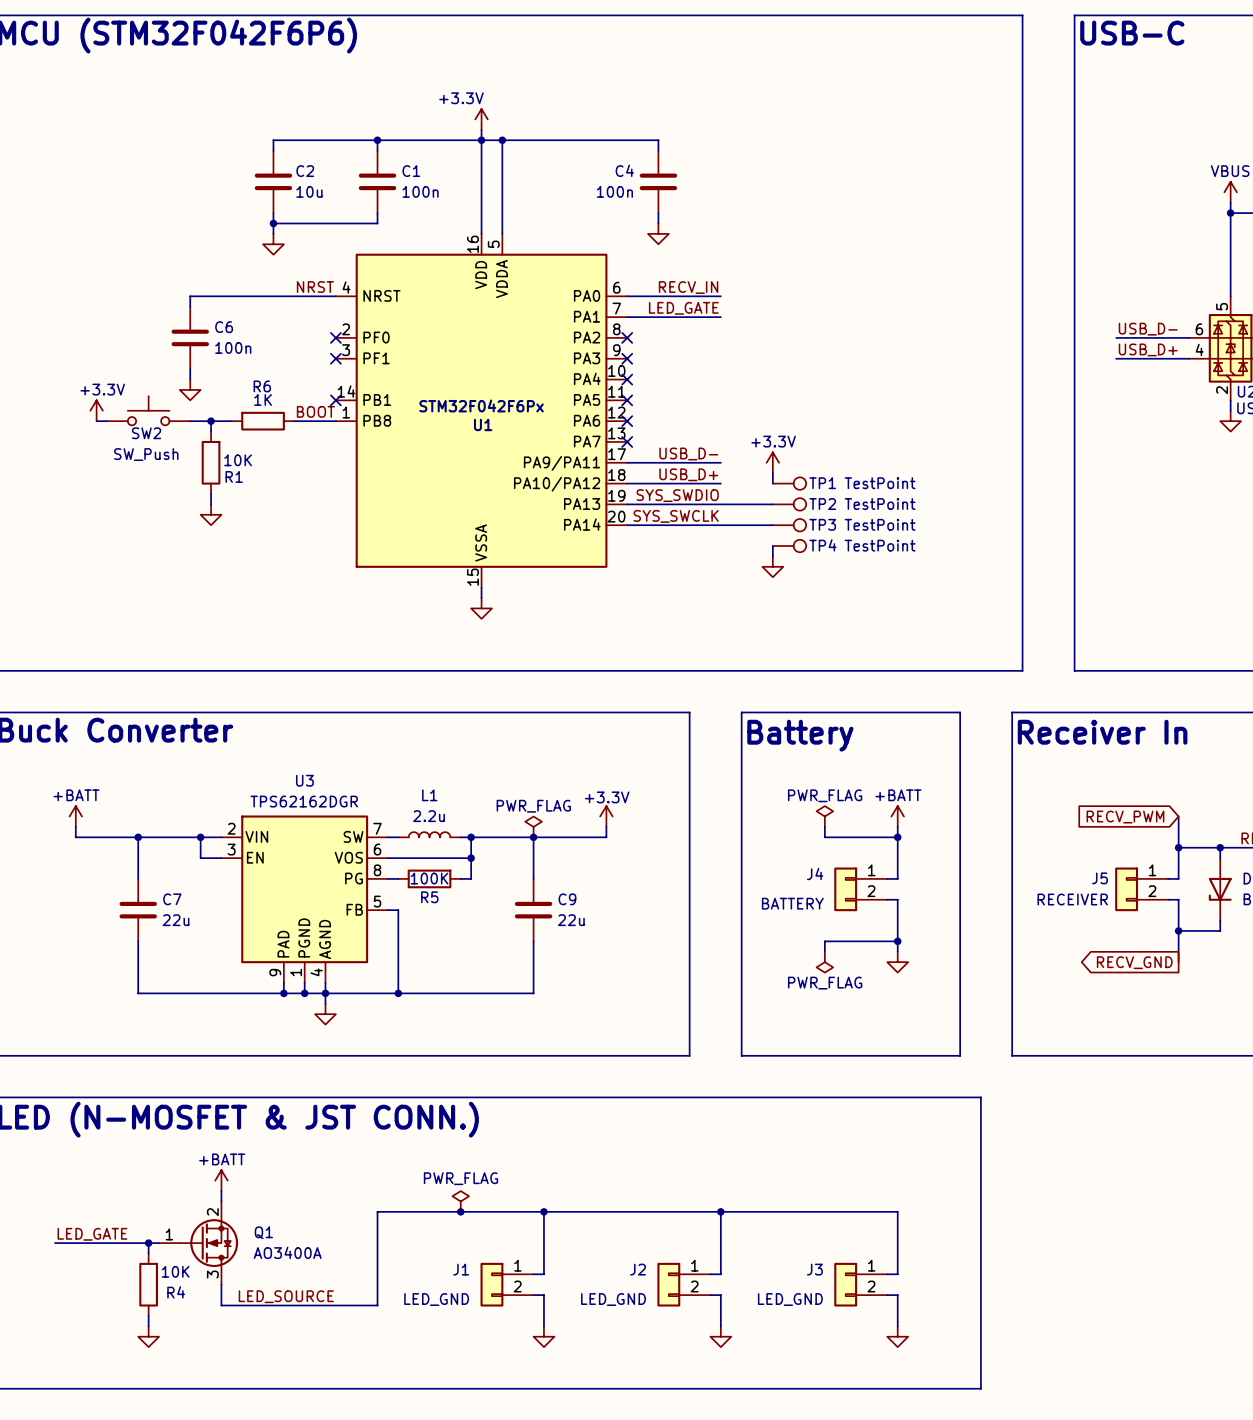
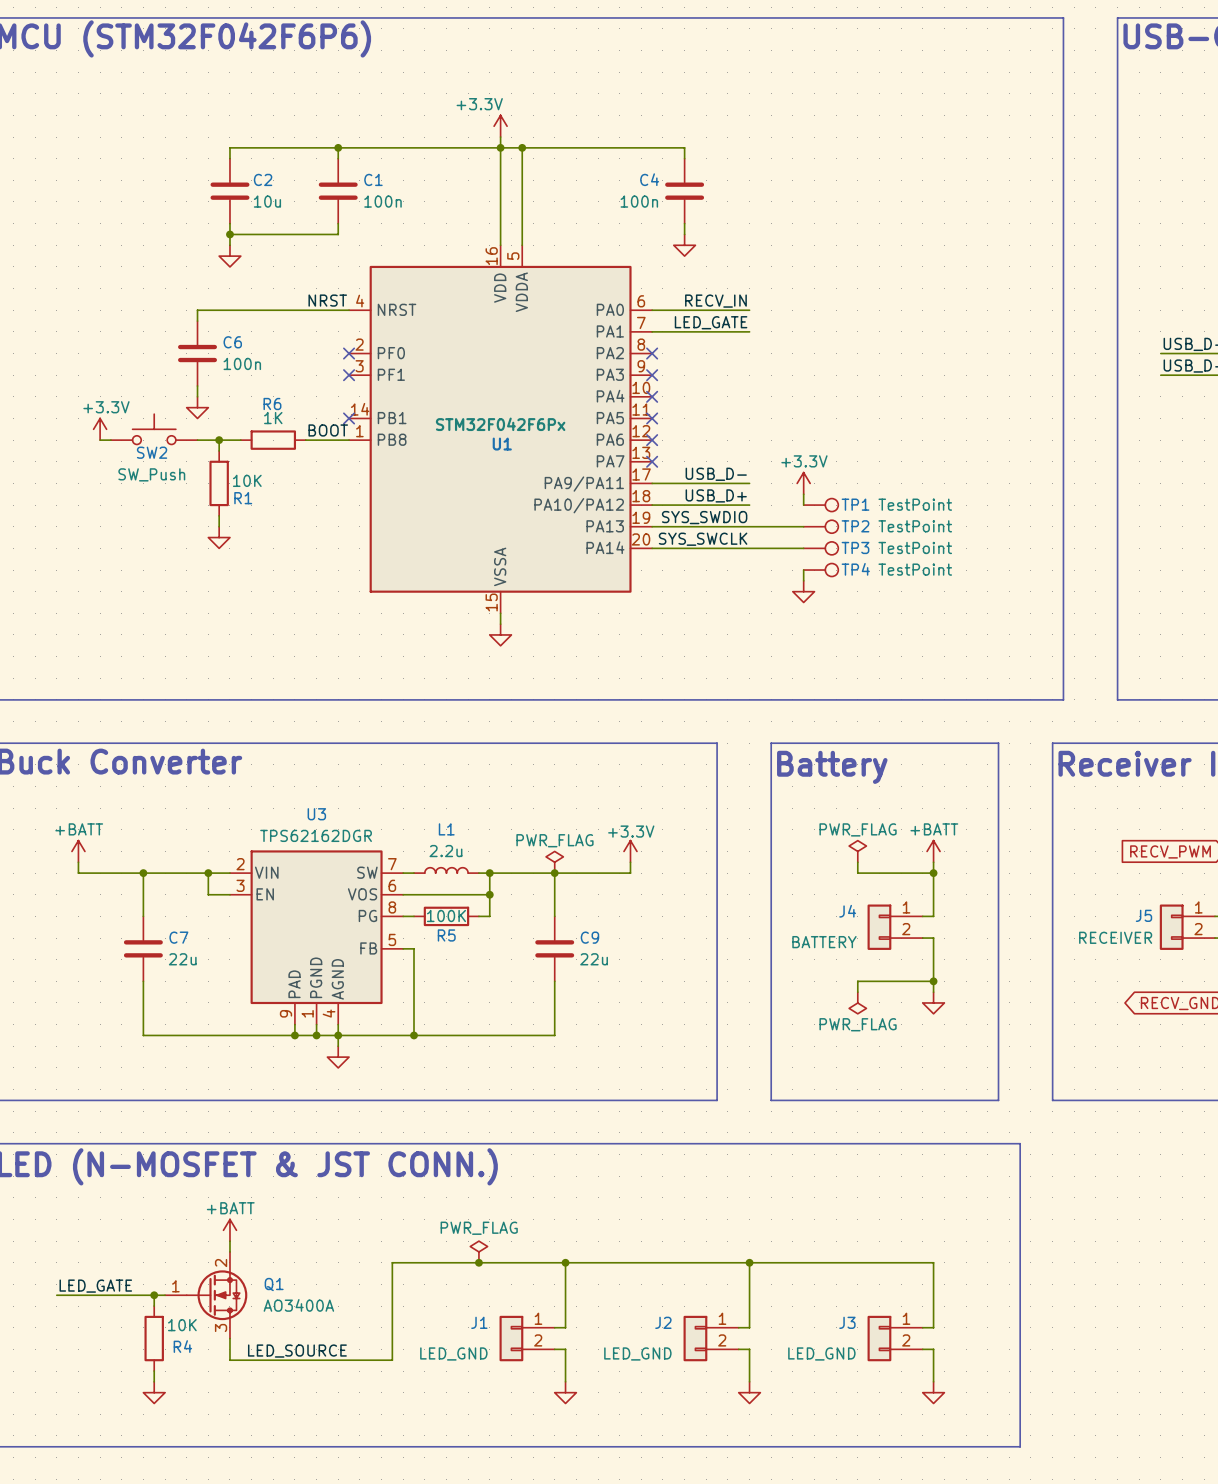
wire: (273, 140) (273, 150) -> (284, 147) (229, 147) (229, 158)
junction: none -> (338, 147)
wire: (377, 140) (377, 150) -> (338, 147) (338, 158)
junction: (377, 140) -> none
C2 position: (273, 181) -> (229, 191)
C1 position: (377, 181) -> (338, 191)
wire: (273, 213) (273, 233) -> (229, 223) (229, 245)
wire: (377, 213) (377, 223) (325, 223) -> (338, 223) (338, 234)
wire: none -> (229, 234) (284, 234)
junction: none -> (229, 234)
junction: (273, 223) -> none
power symbol position: (273, 244) -> (229, 256)

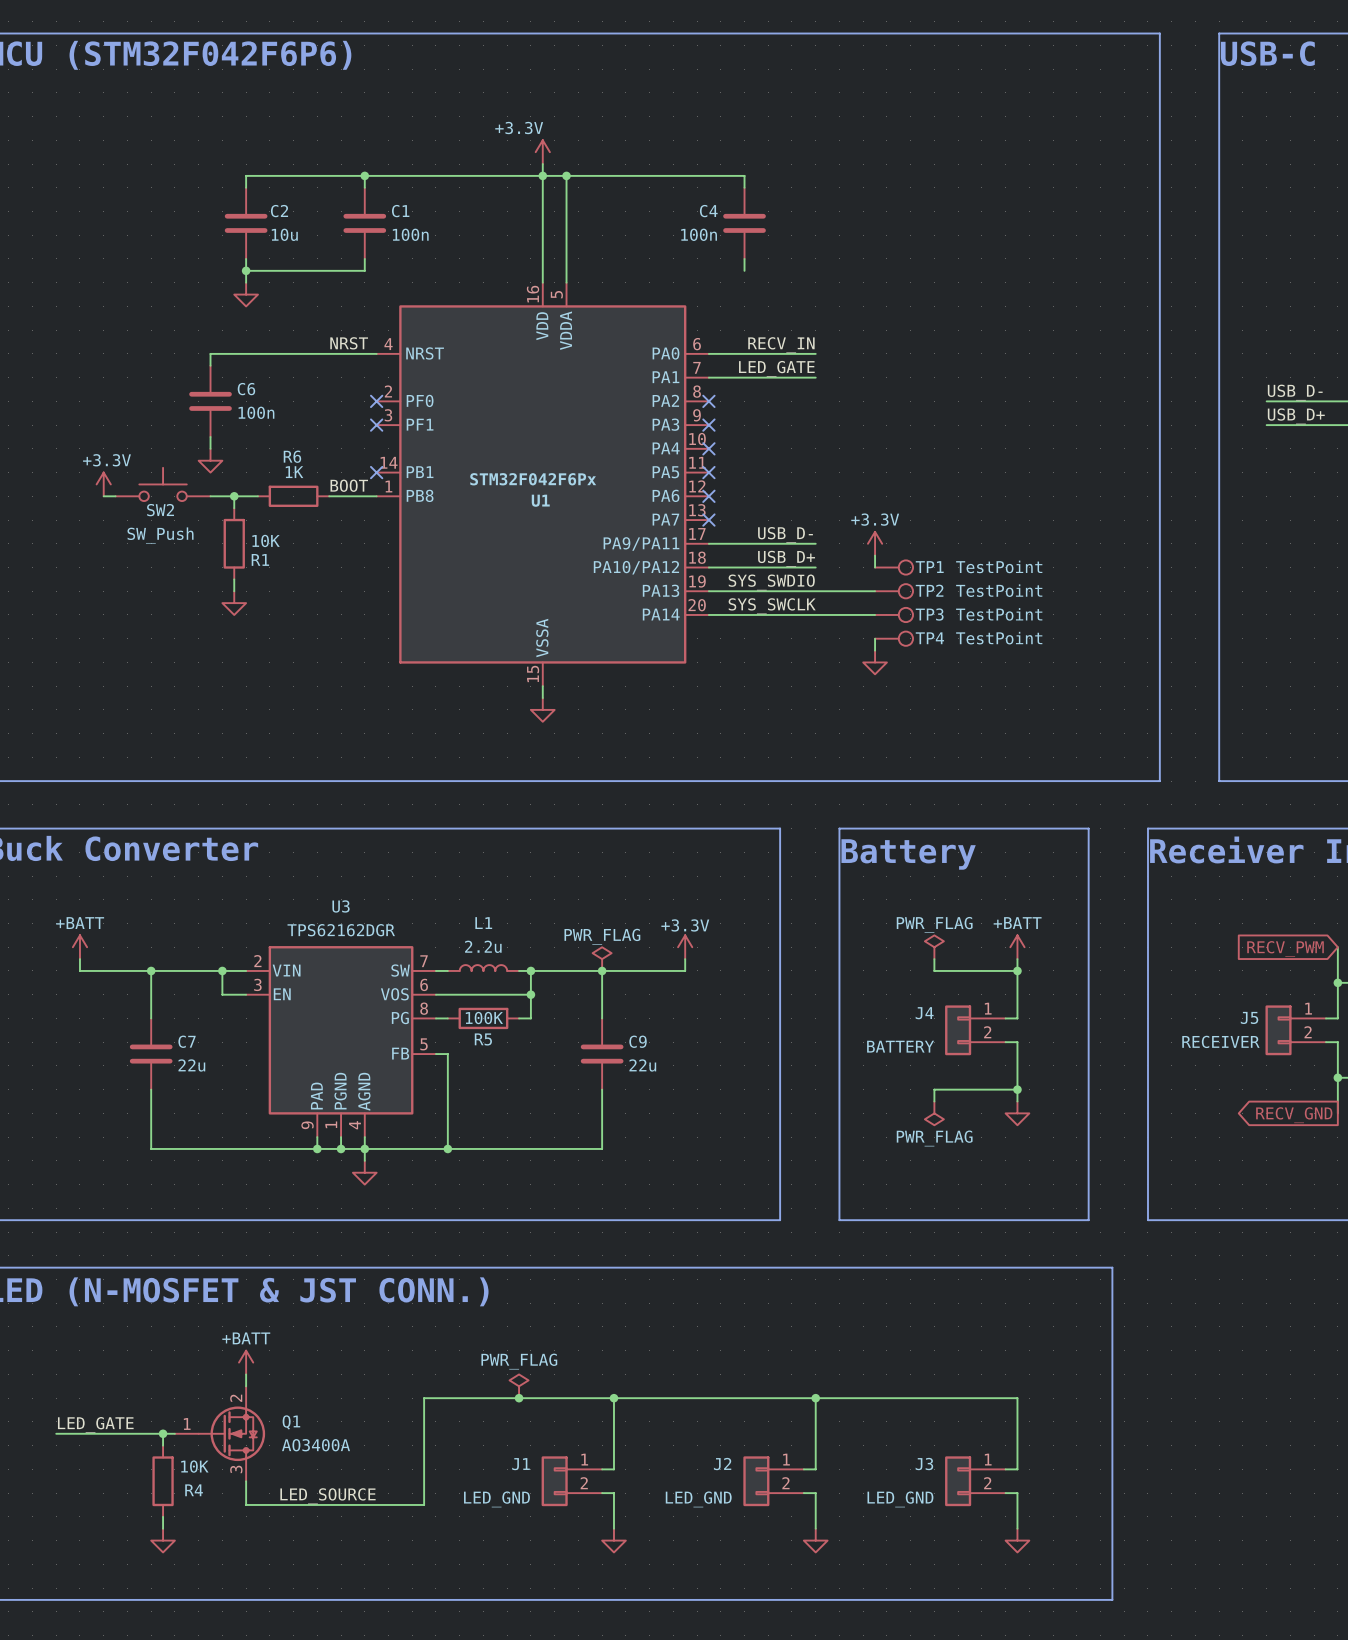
power symbol: (684, 245) -> none

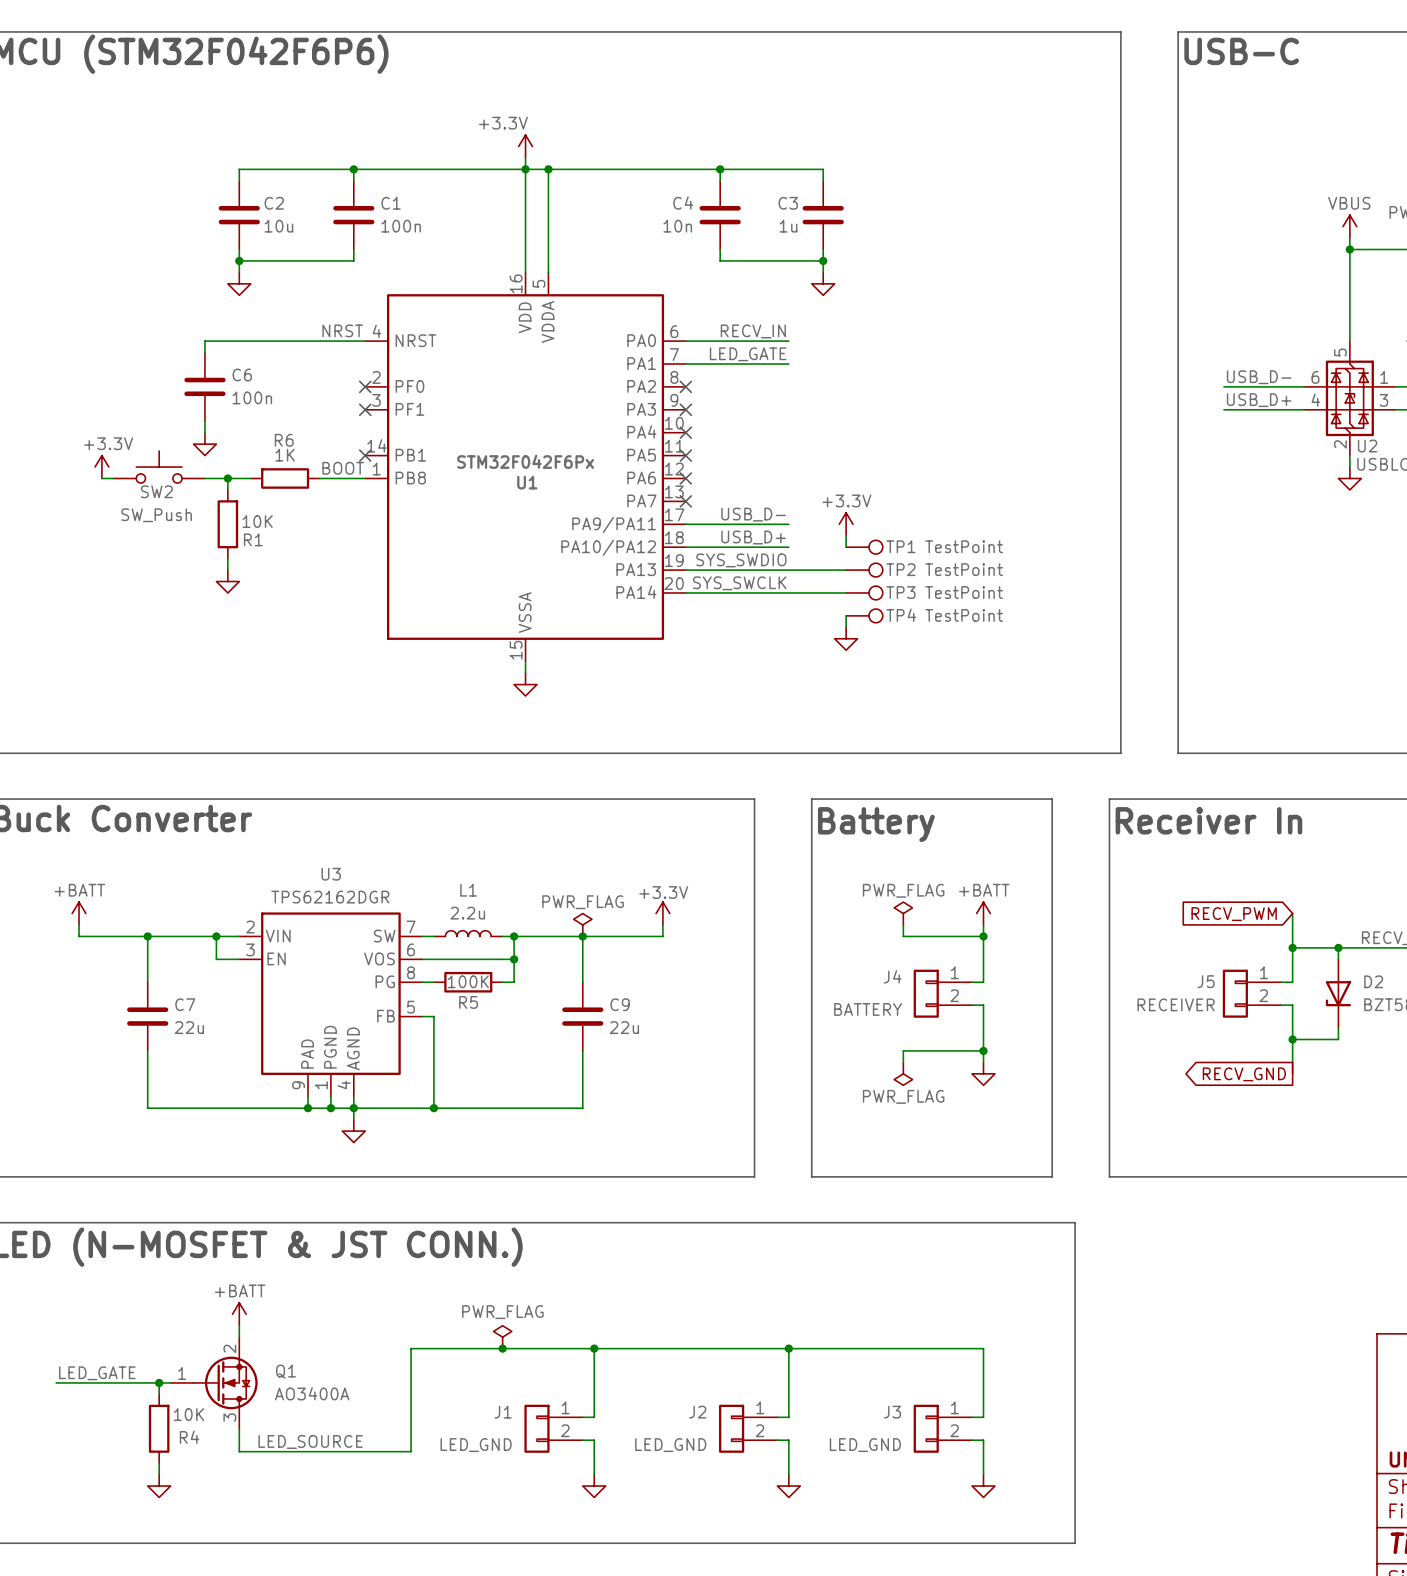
wire: none -> (720, 169) (823, 169) (823, 180)
junction: none -> (720, 169)
C3: none -> 1u (823, 215)
C4 value: 100n (699, 234) -> 10n (677, 226)
wire: none -> (823, 249) (823, 272)
wire: none -> (720, 260) (823, 260)
junction: none -> (823, 260)
power symbol: none -> (823, 283)

